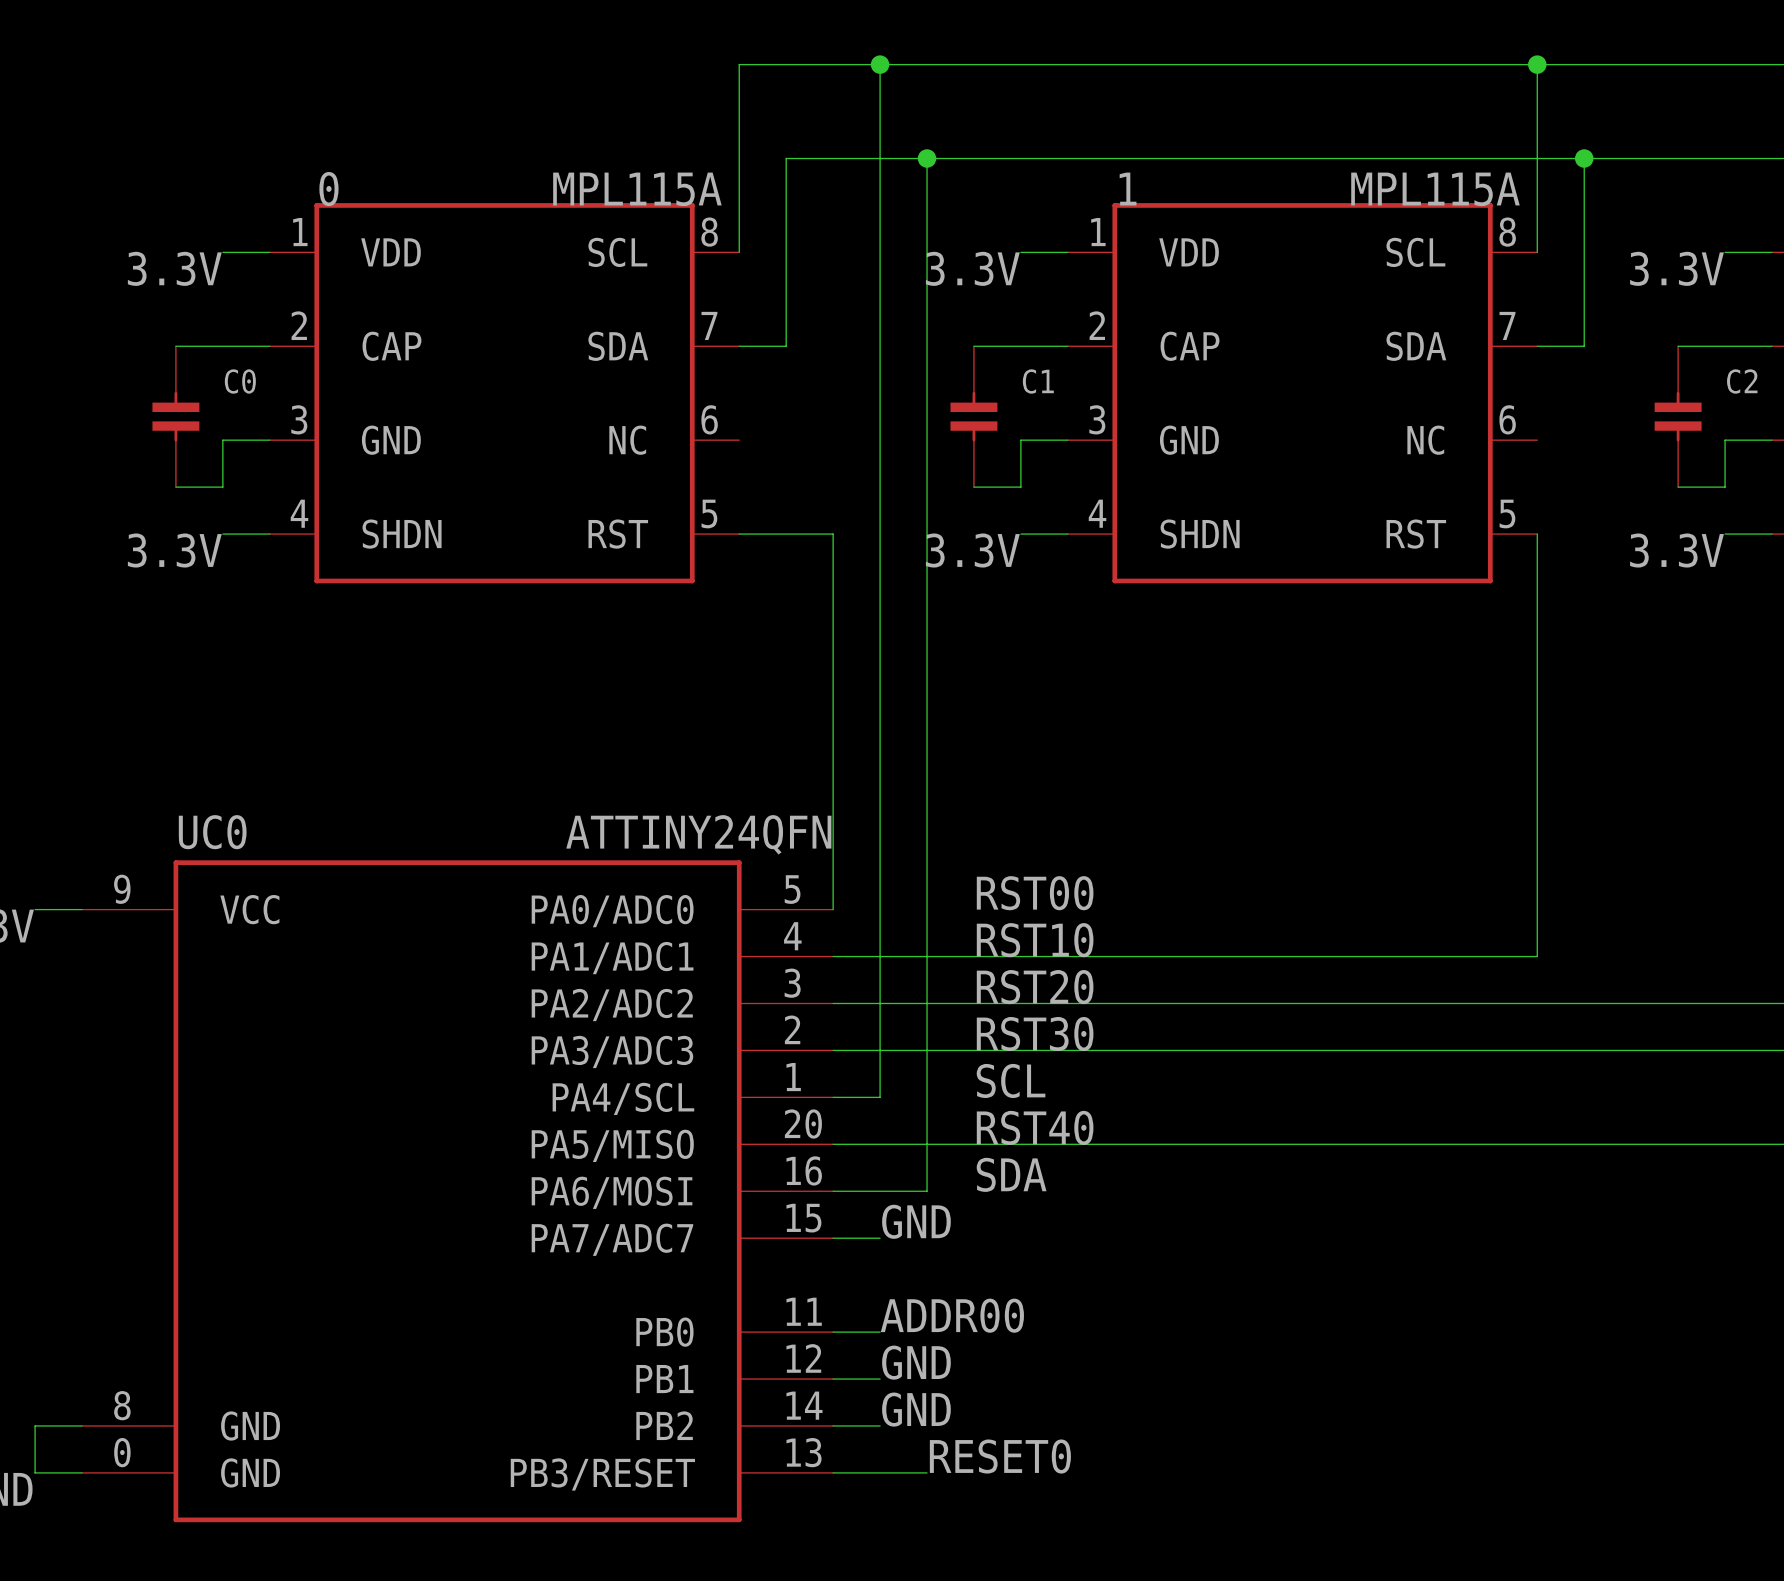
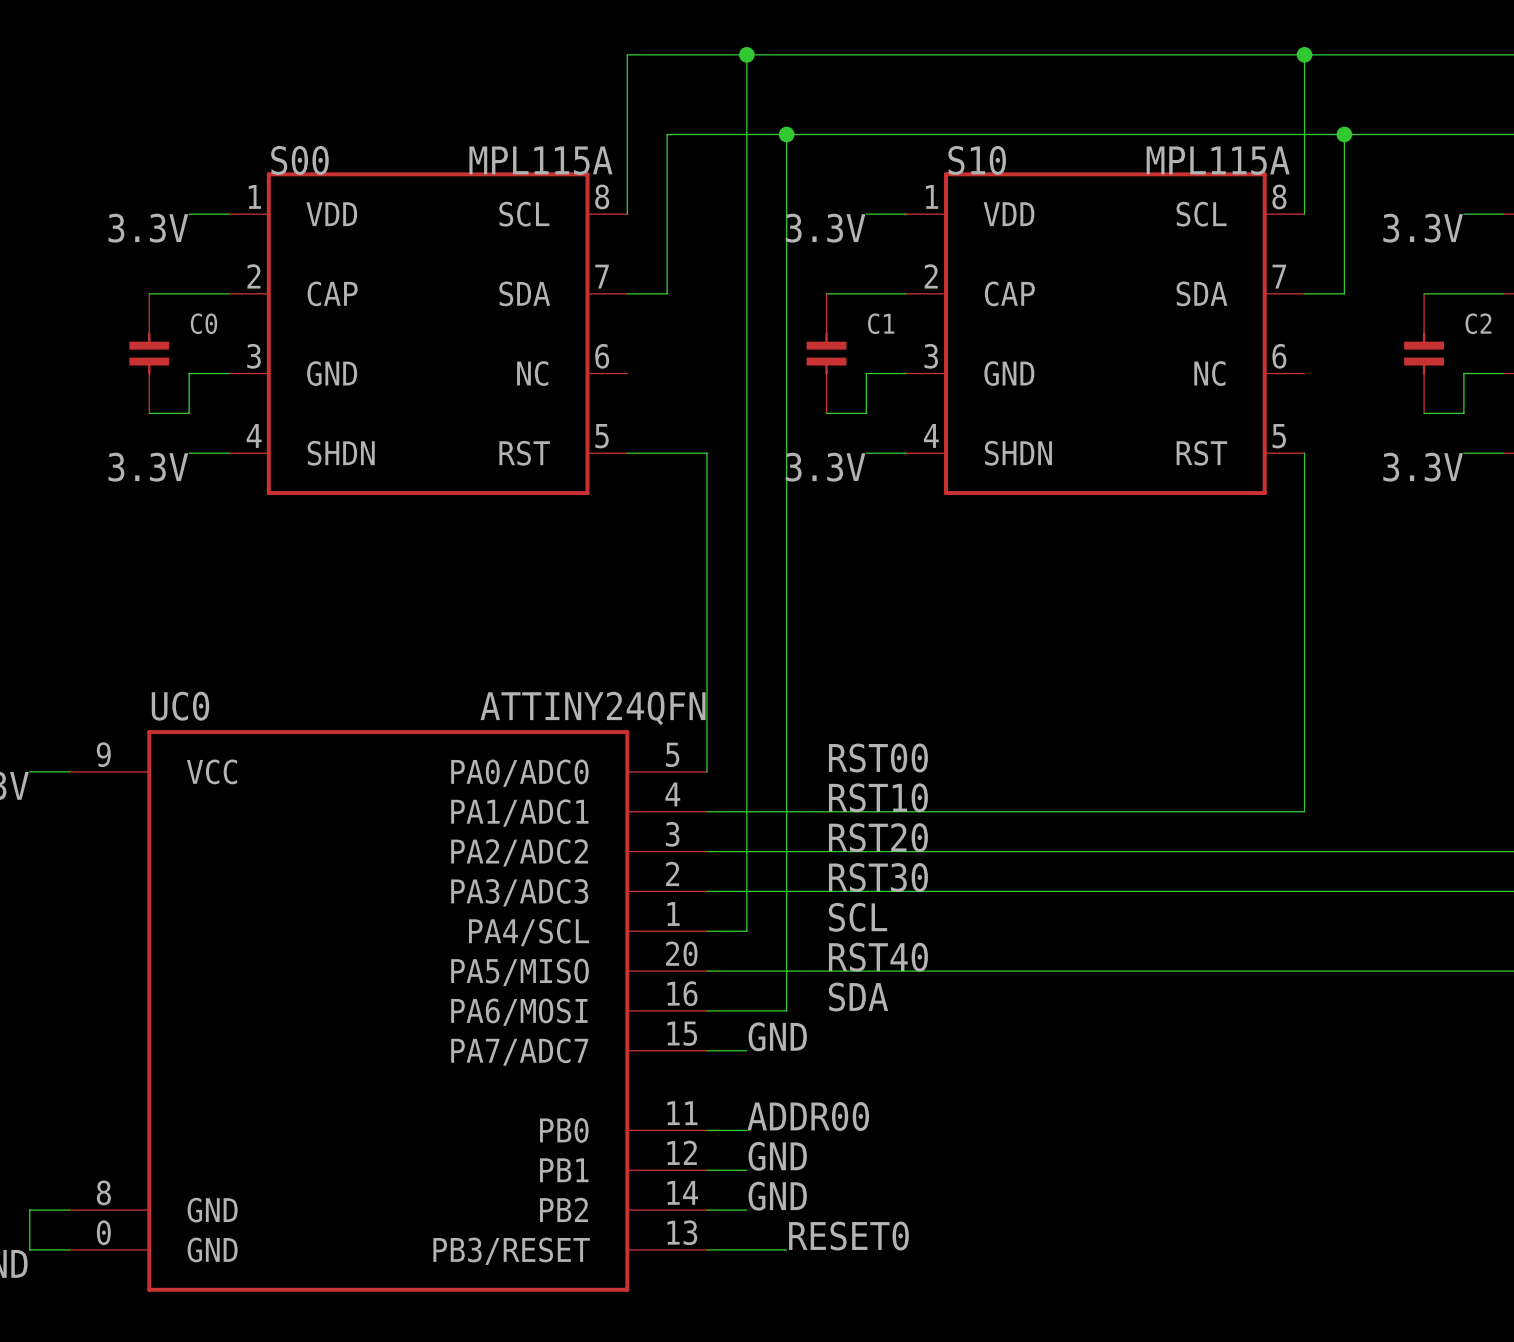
0 name: 0 (328, 189) -> S00 (299, 160)
1 name: 1 (1128, 189) -> S10 (977, 160)

